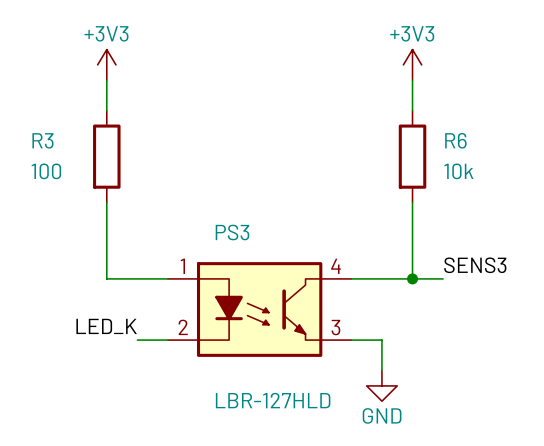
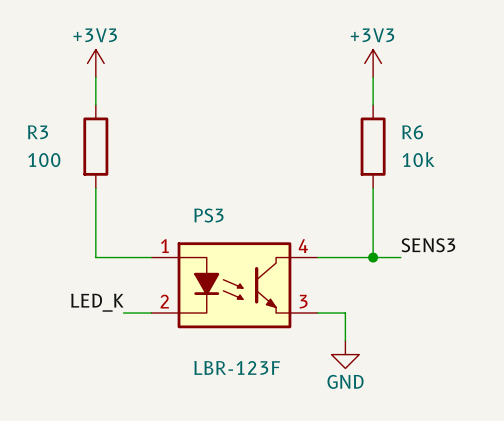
PS3 value: LBR-127HLD (273, 400) -> LBR-123F (237, 367)

